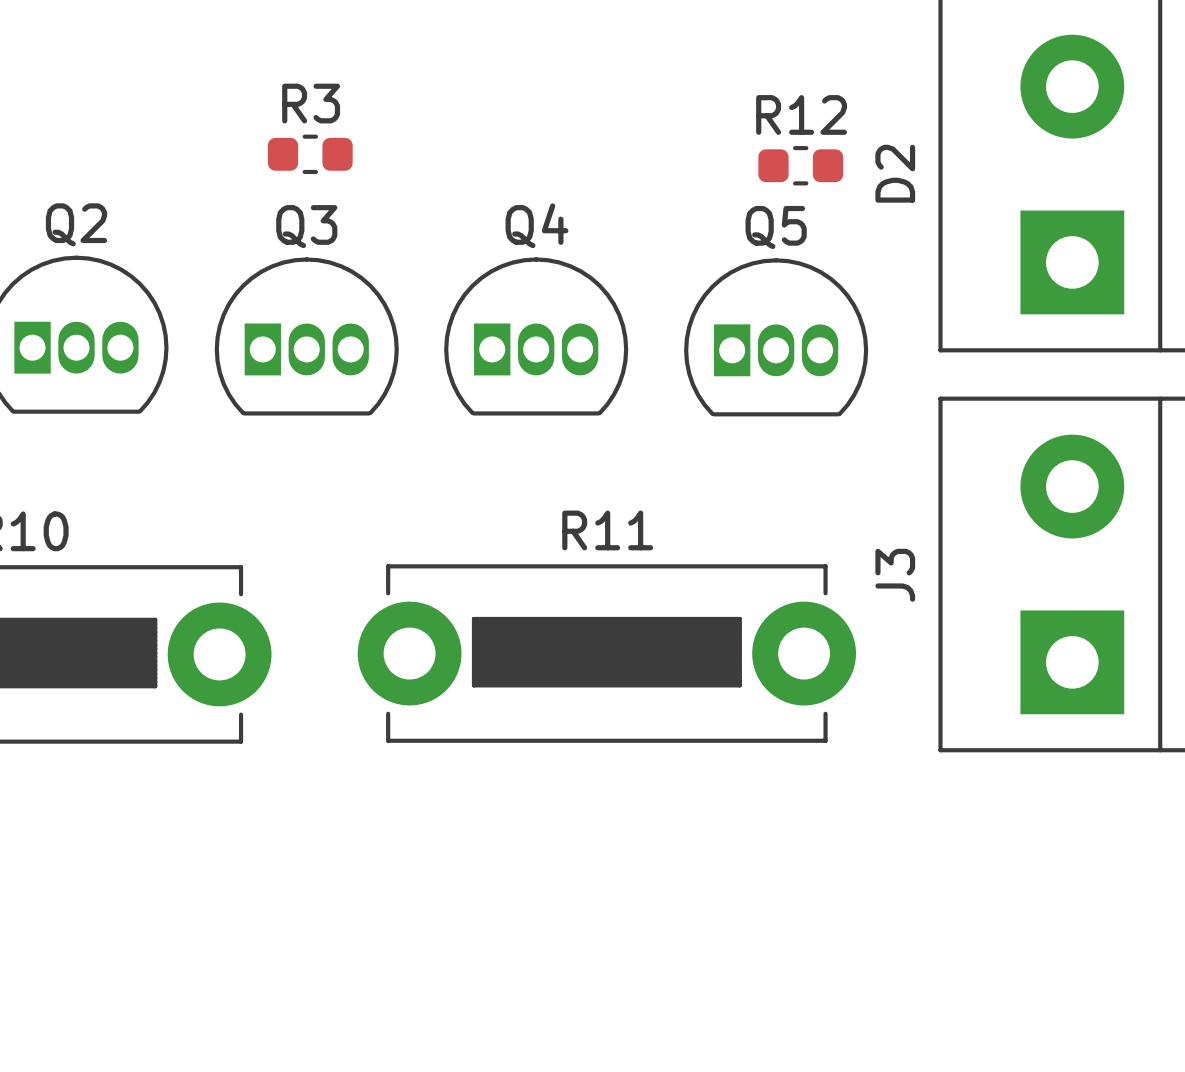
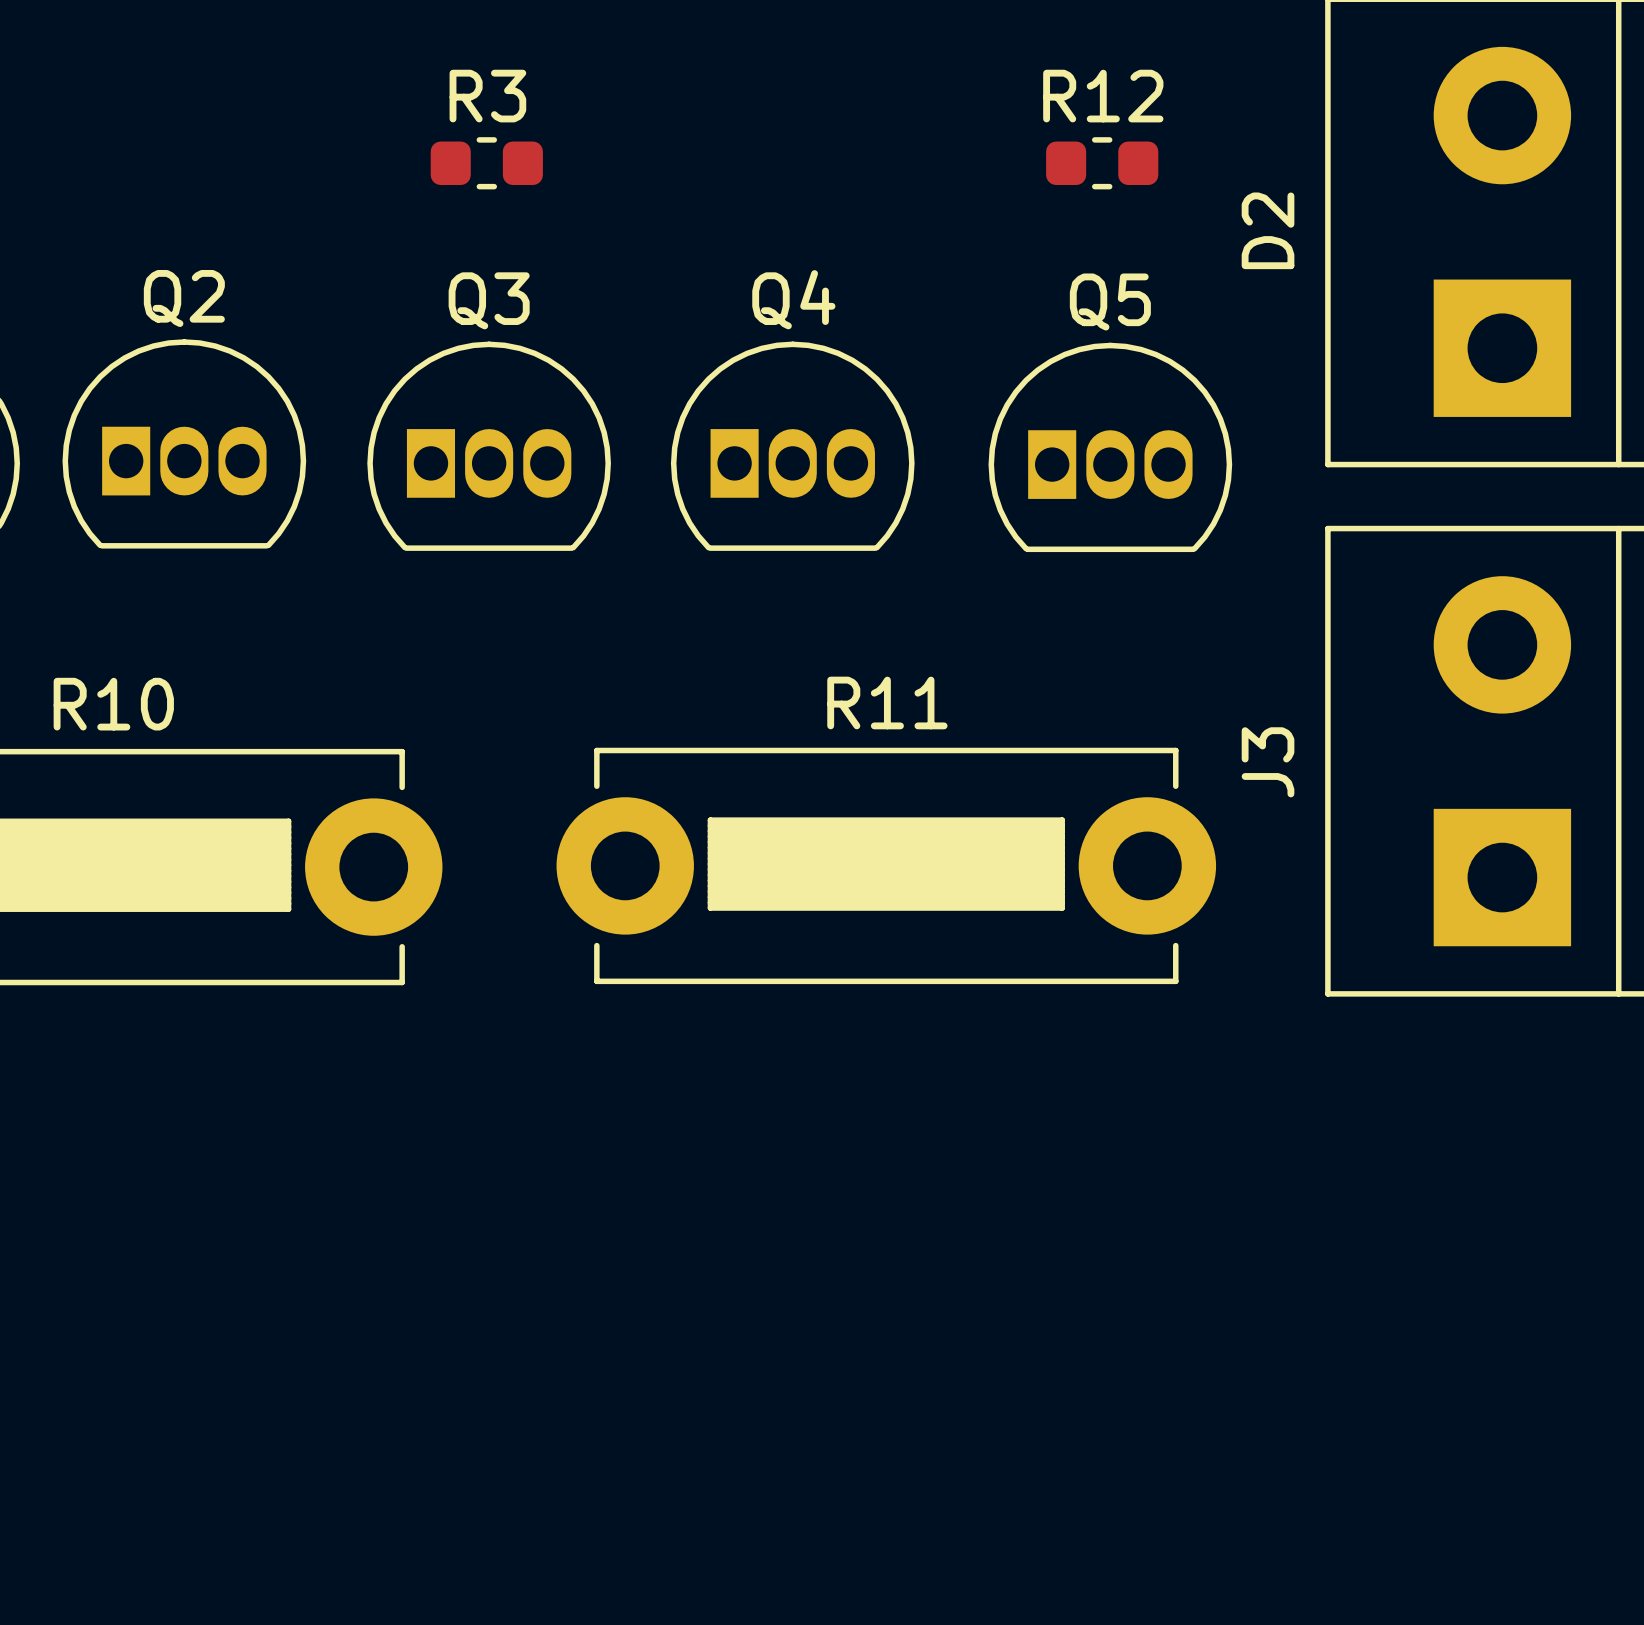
R3 position: (310, 154) -> (486, 163)
R12 position: (800, 165) -> (1102, 163)

